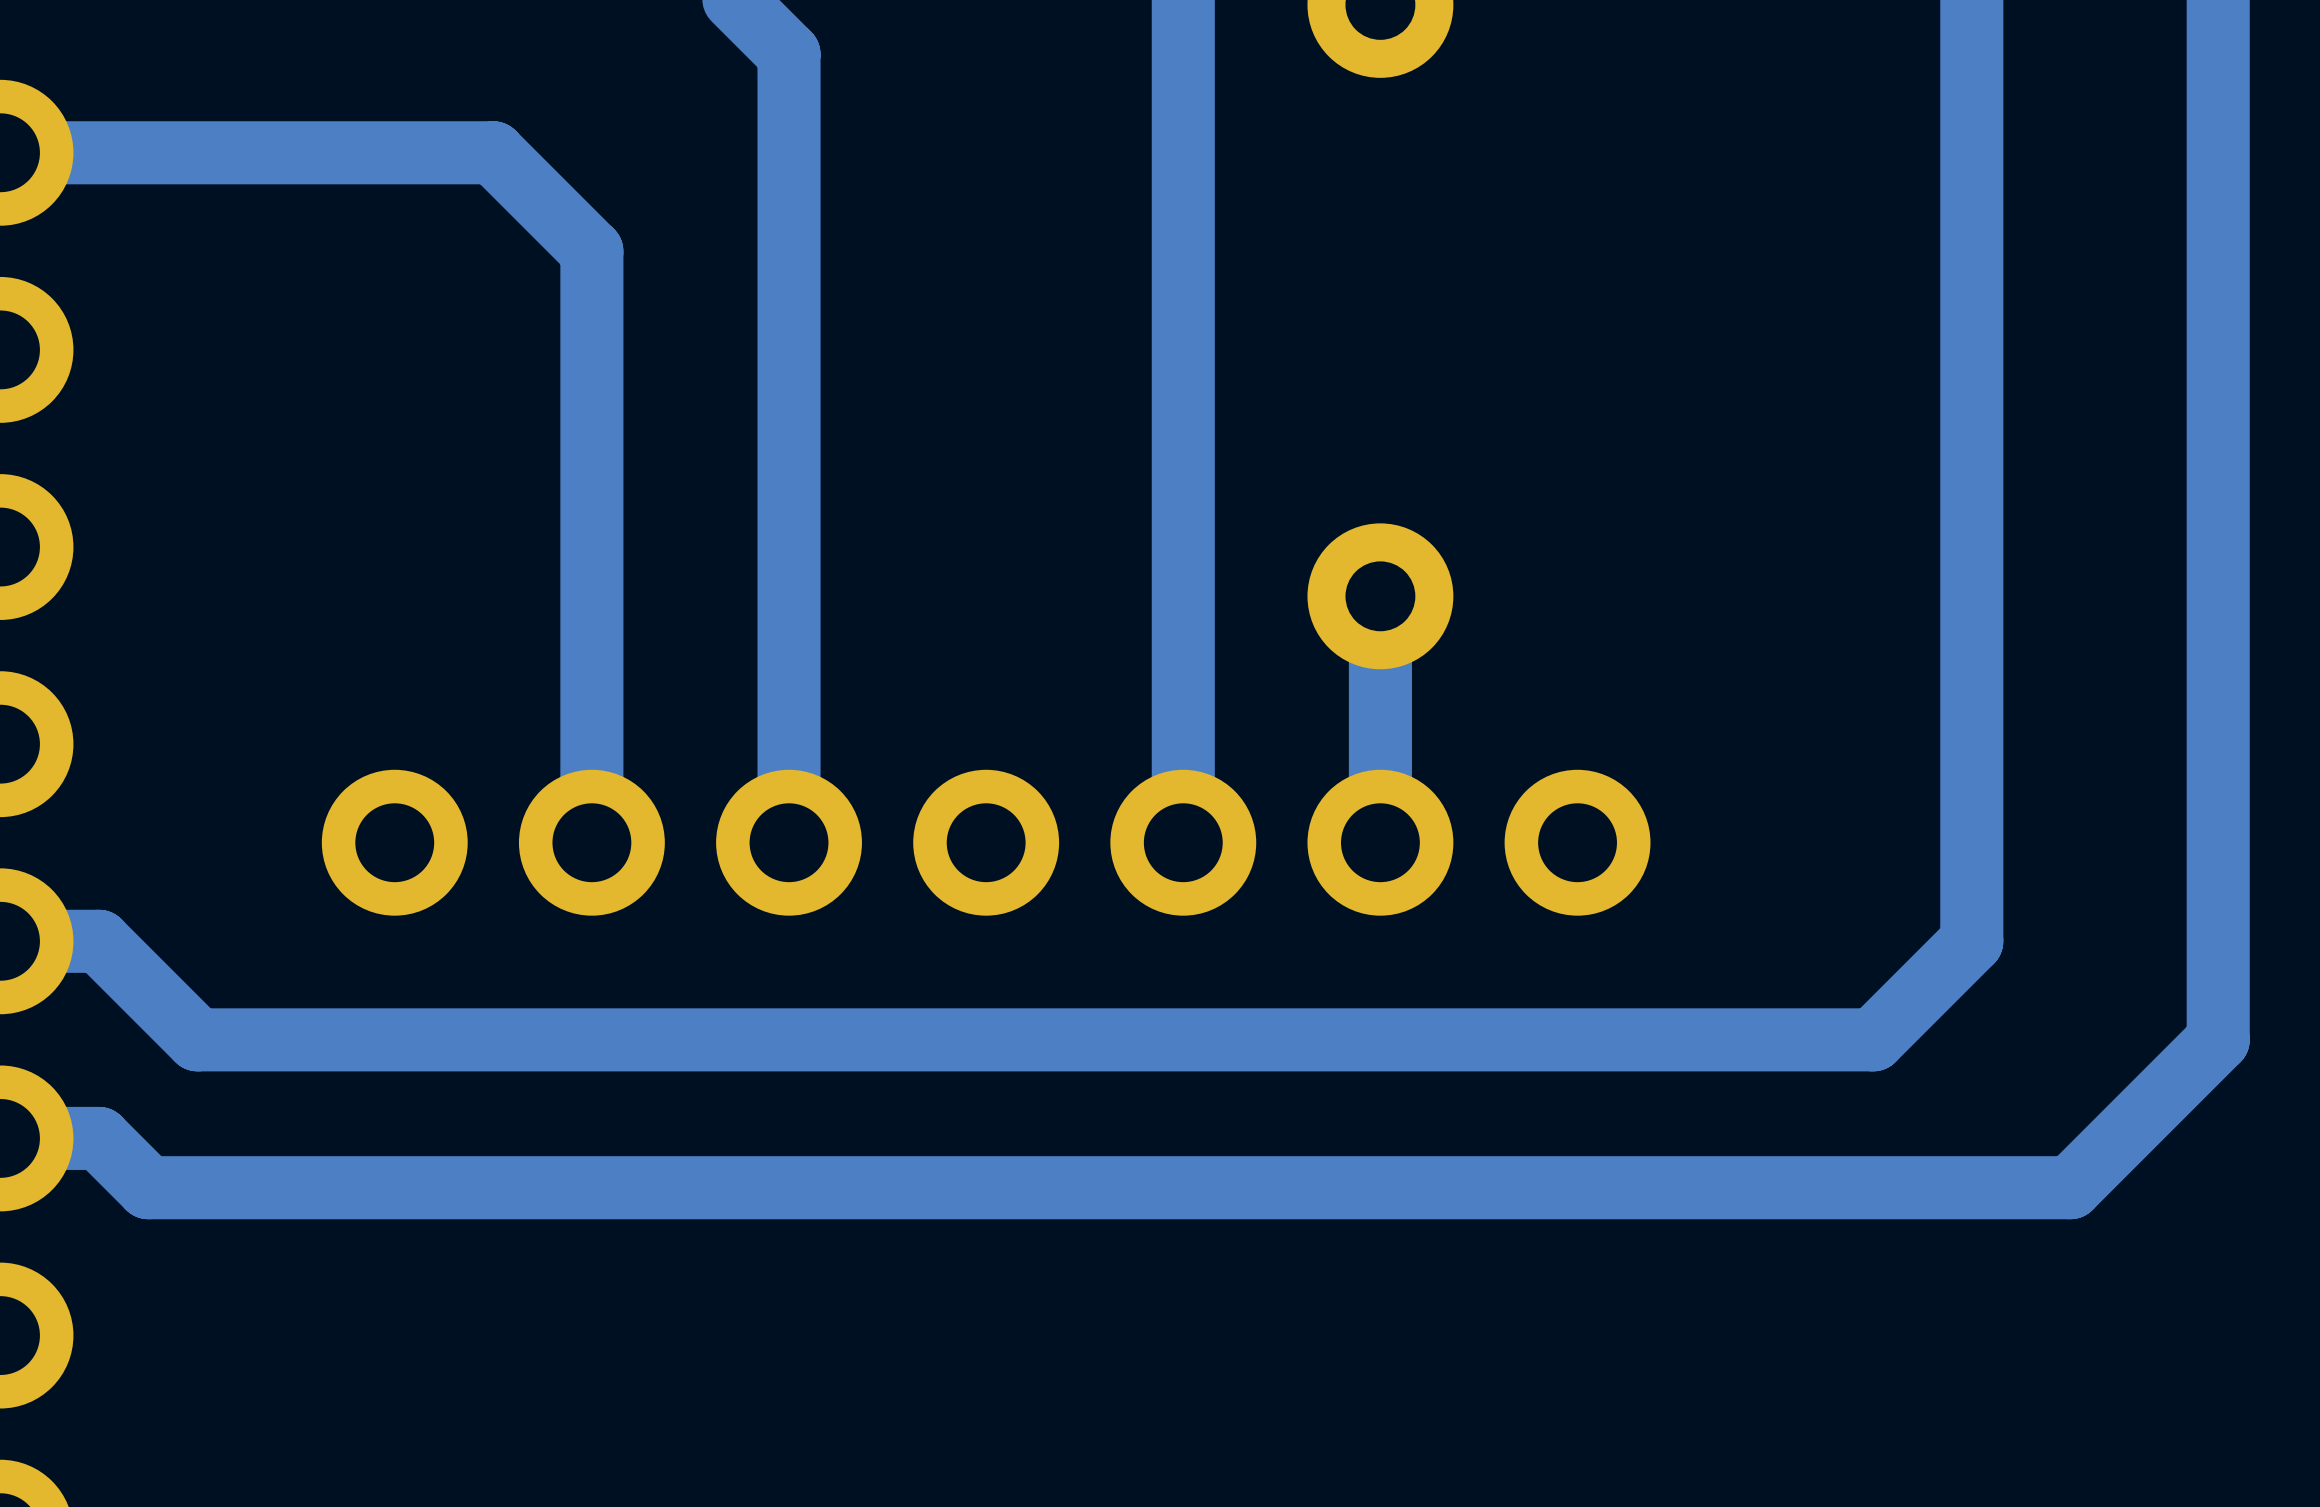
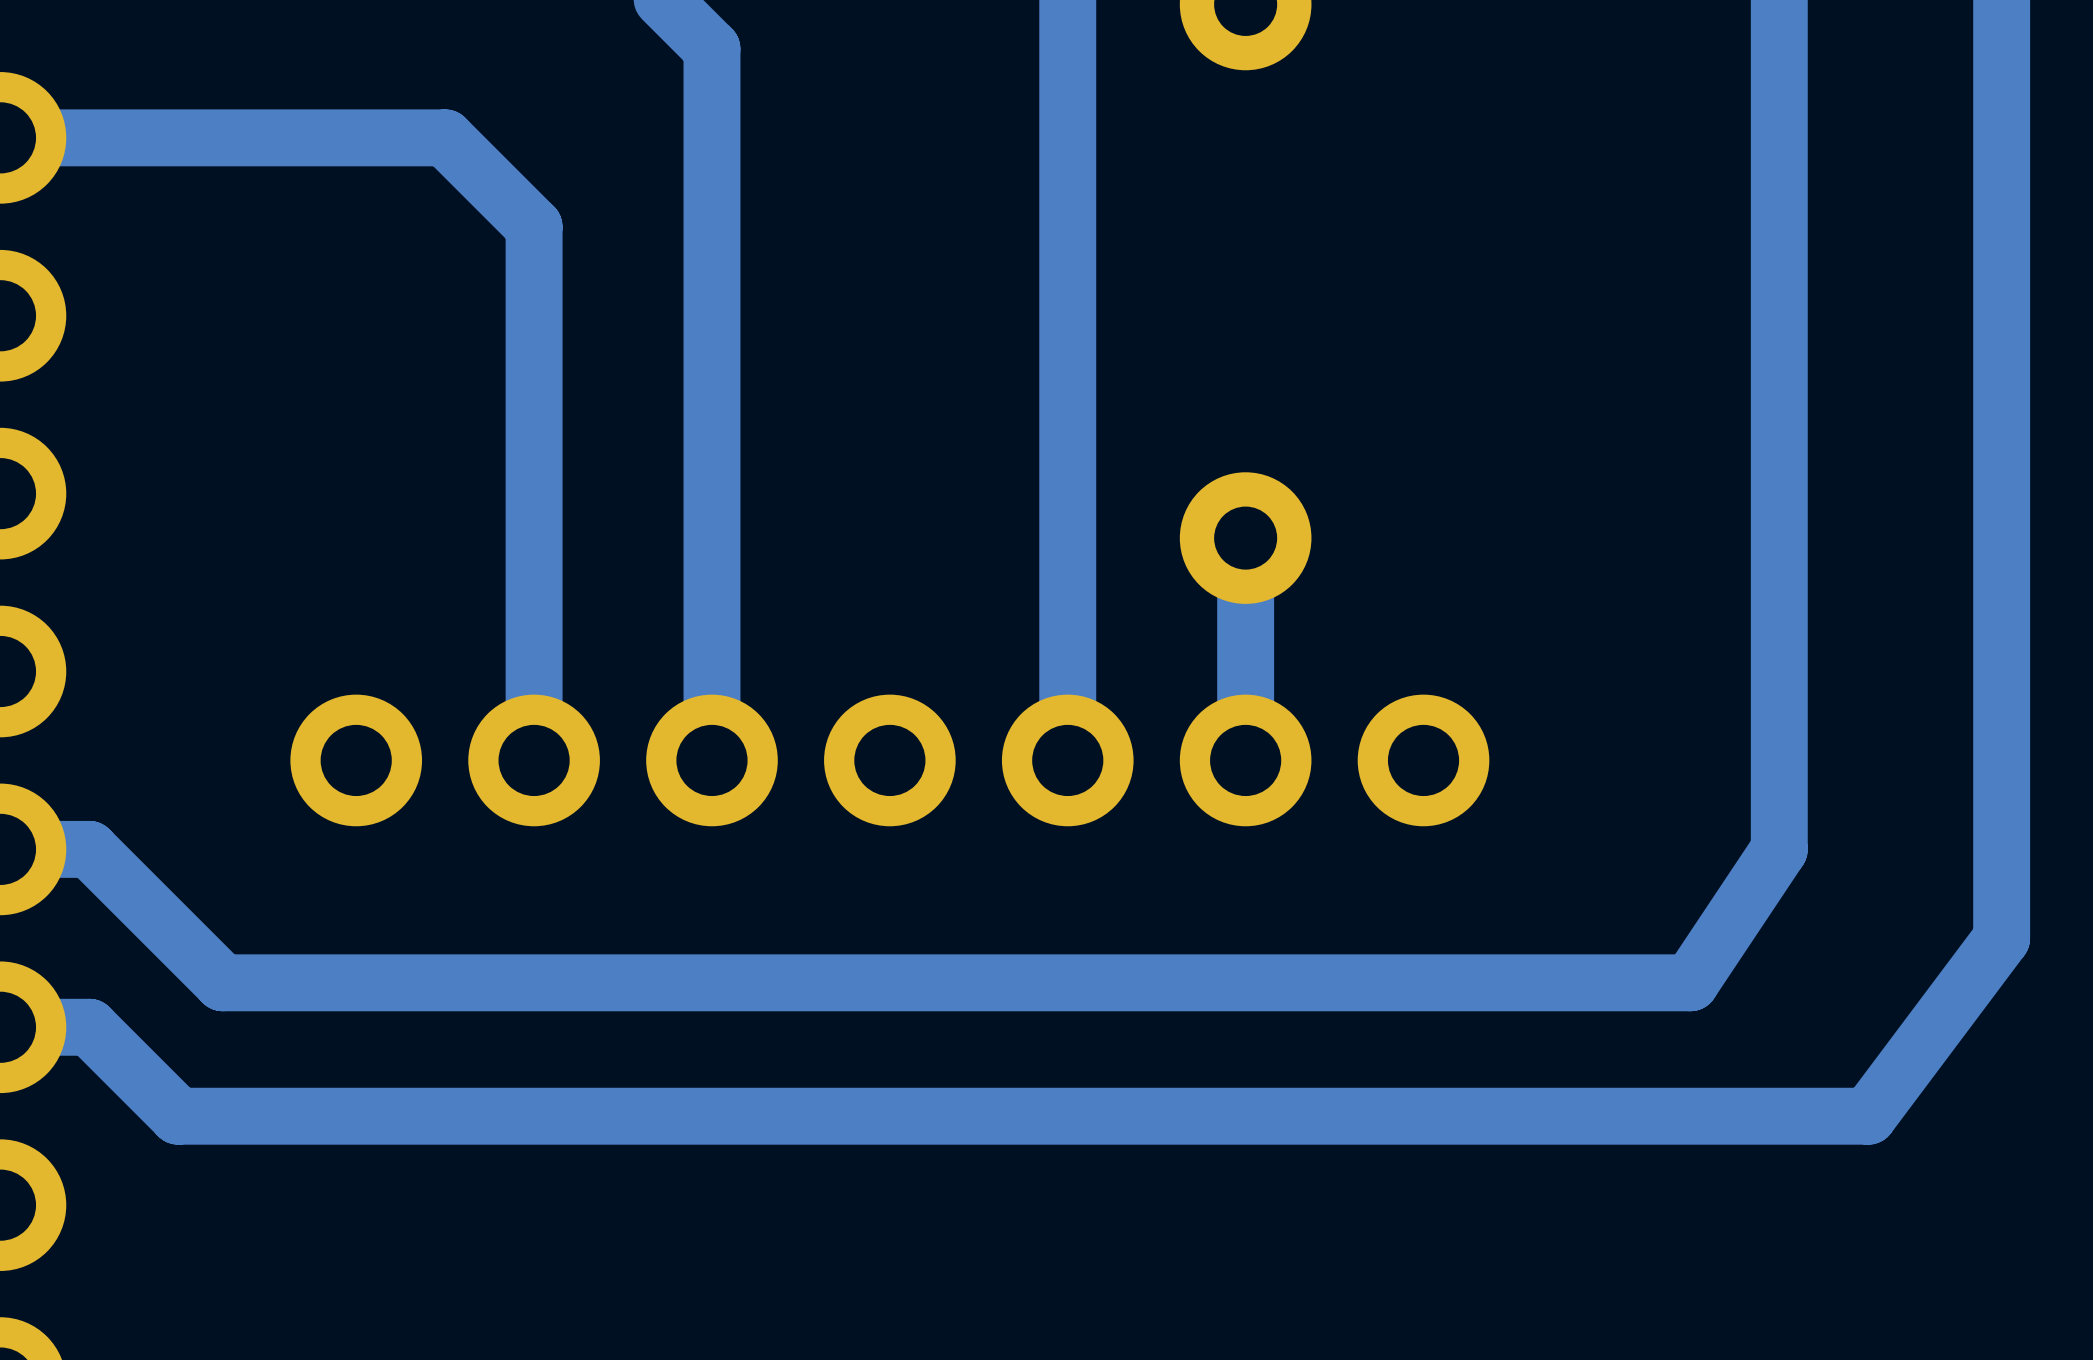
track: (1971, 941) (1873, 1039) (197, 1039) -> (1779, 849) (1690, 982) (222, 982) (178, 938)
track: (2218, 1039) (2070, 1187) (148, 1187) -> (2001, 938) (1868, 1116) (178, 1116) (133, 1071)

